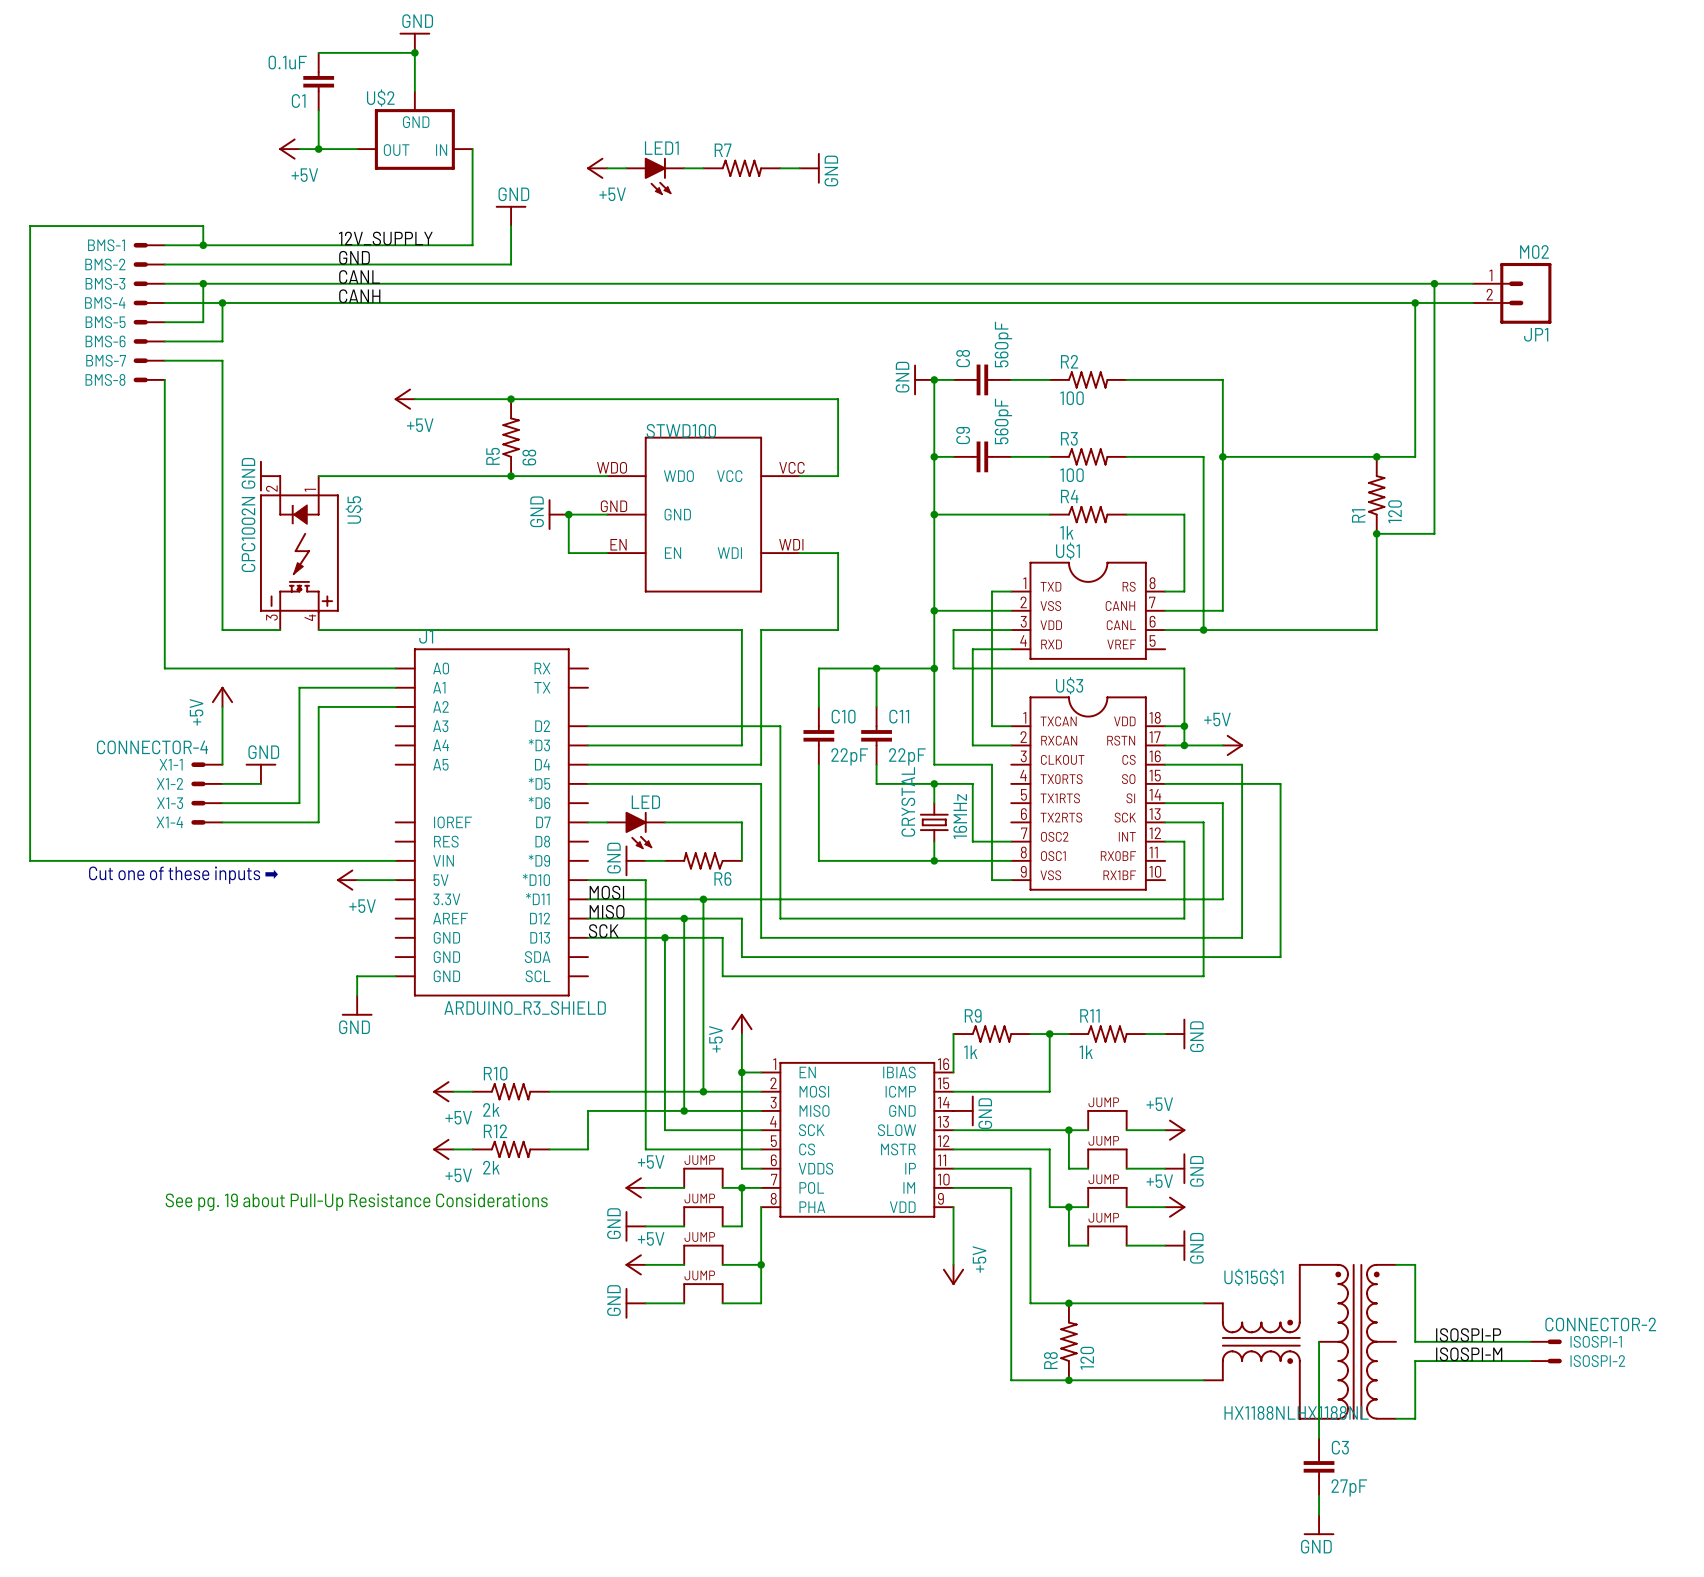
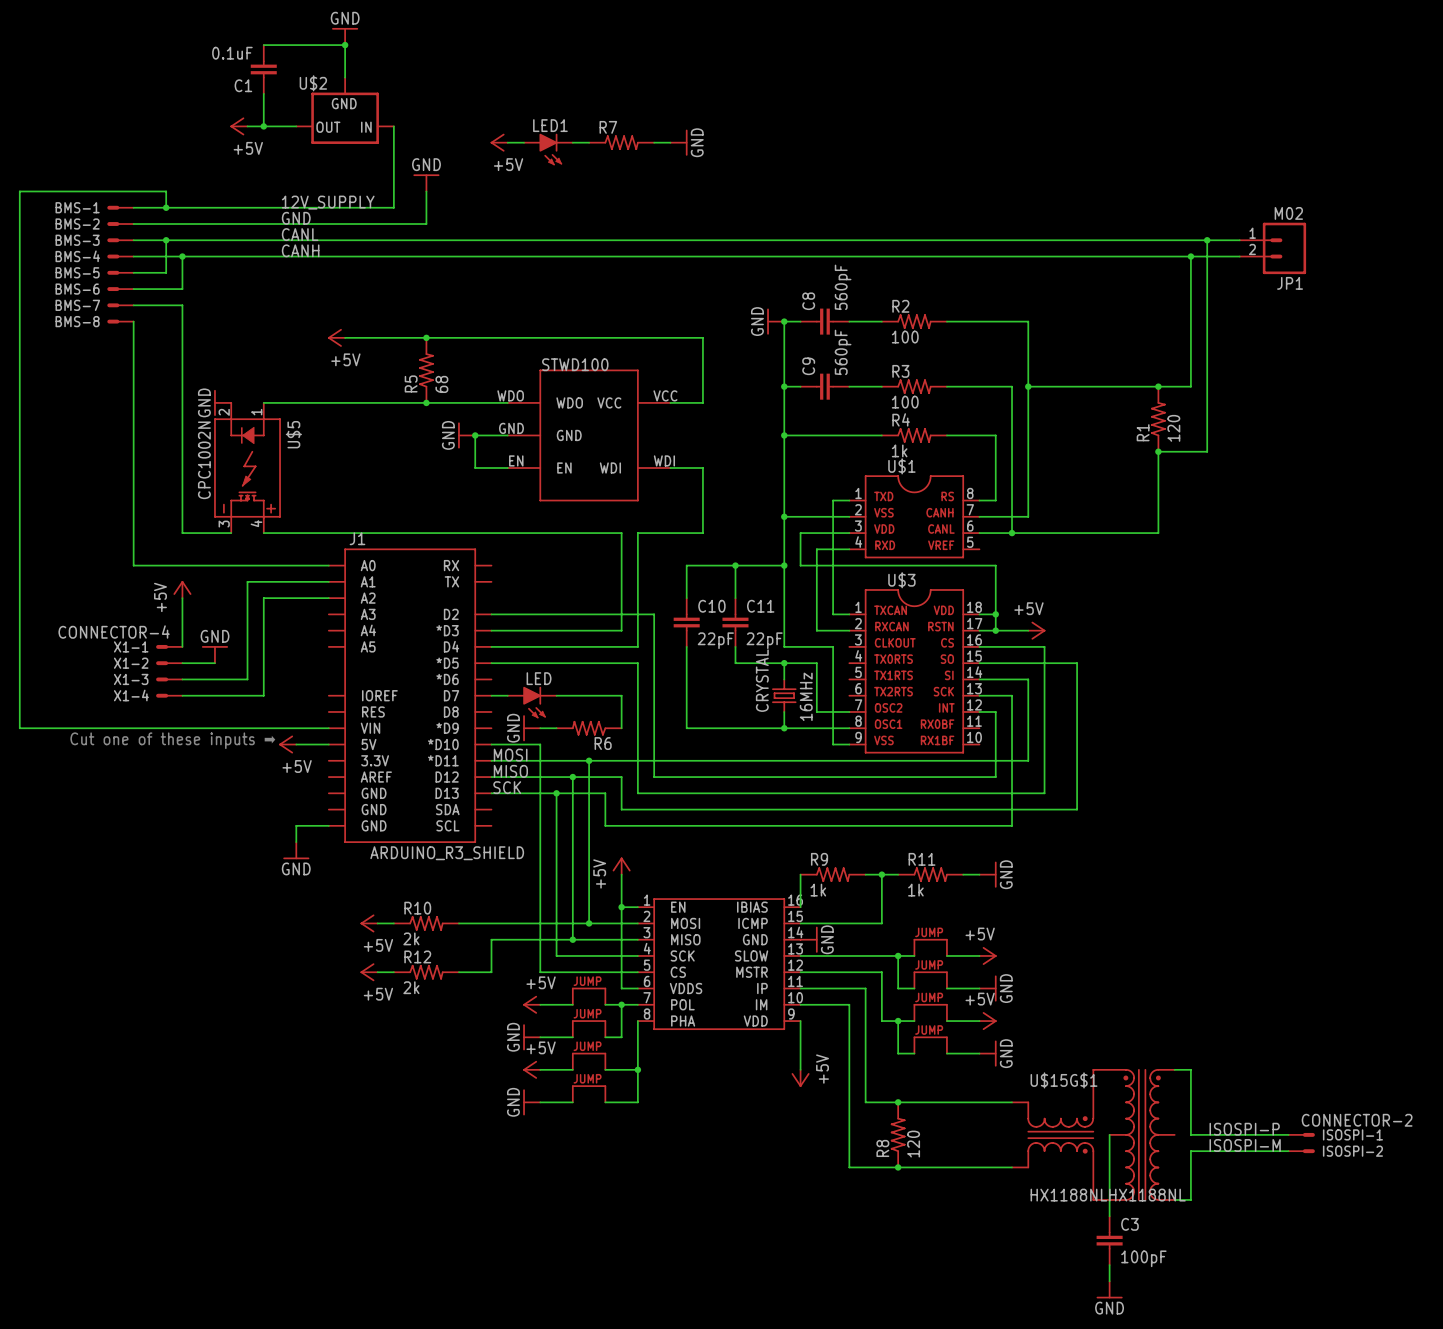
text: See pg. 19 about Pull-Up Resistance Considerations (356, 1202) -> none
C3 value: 27pF (1349, 1487) -> 100pF (1143, 1258)

